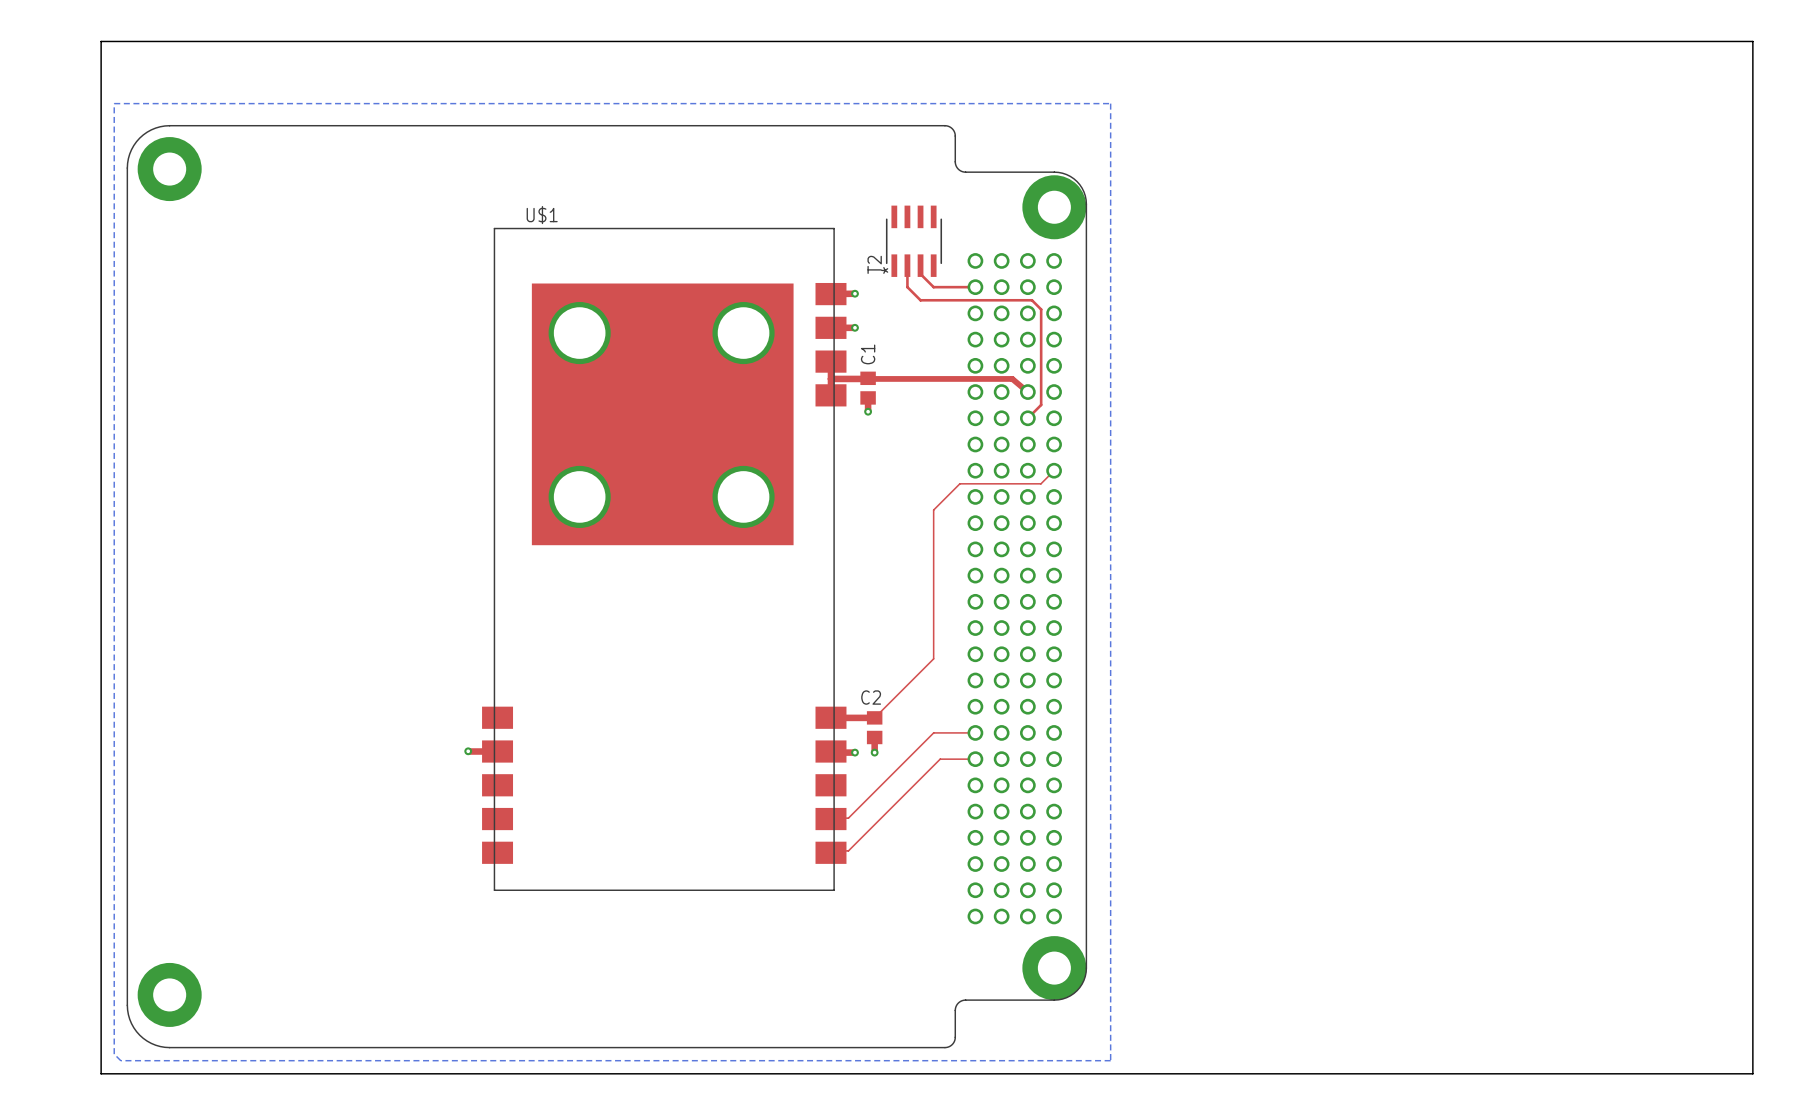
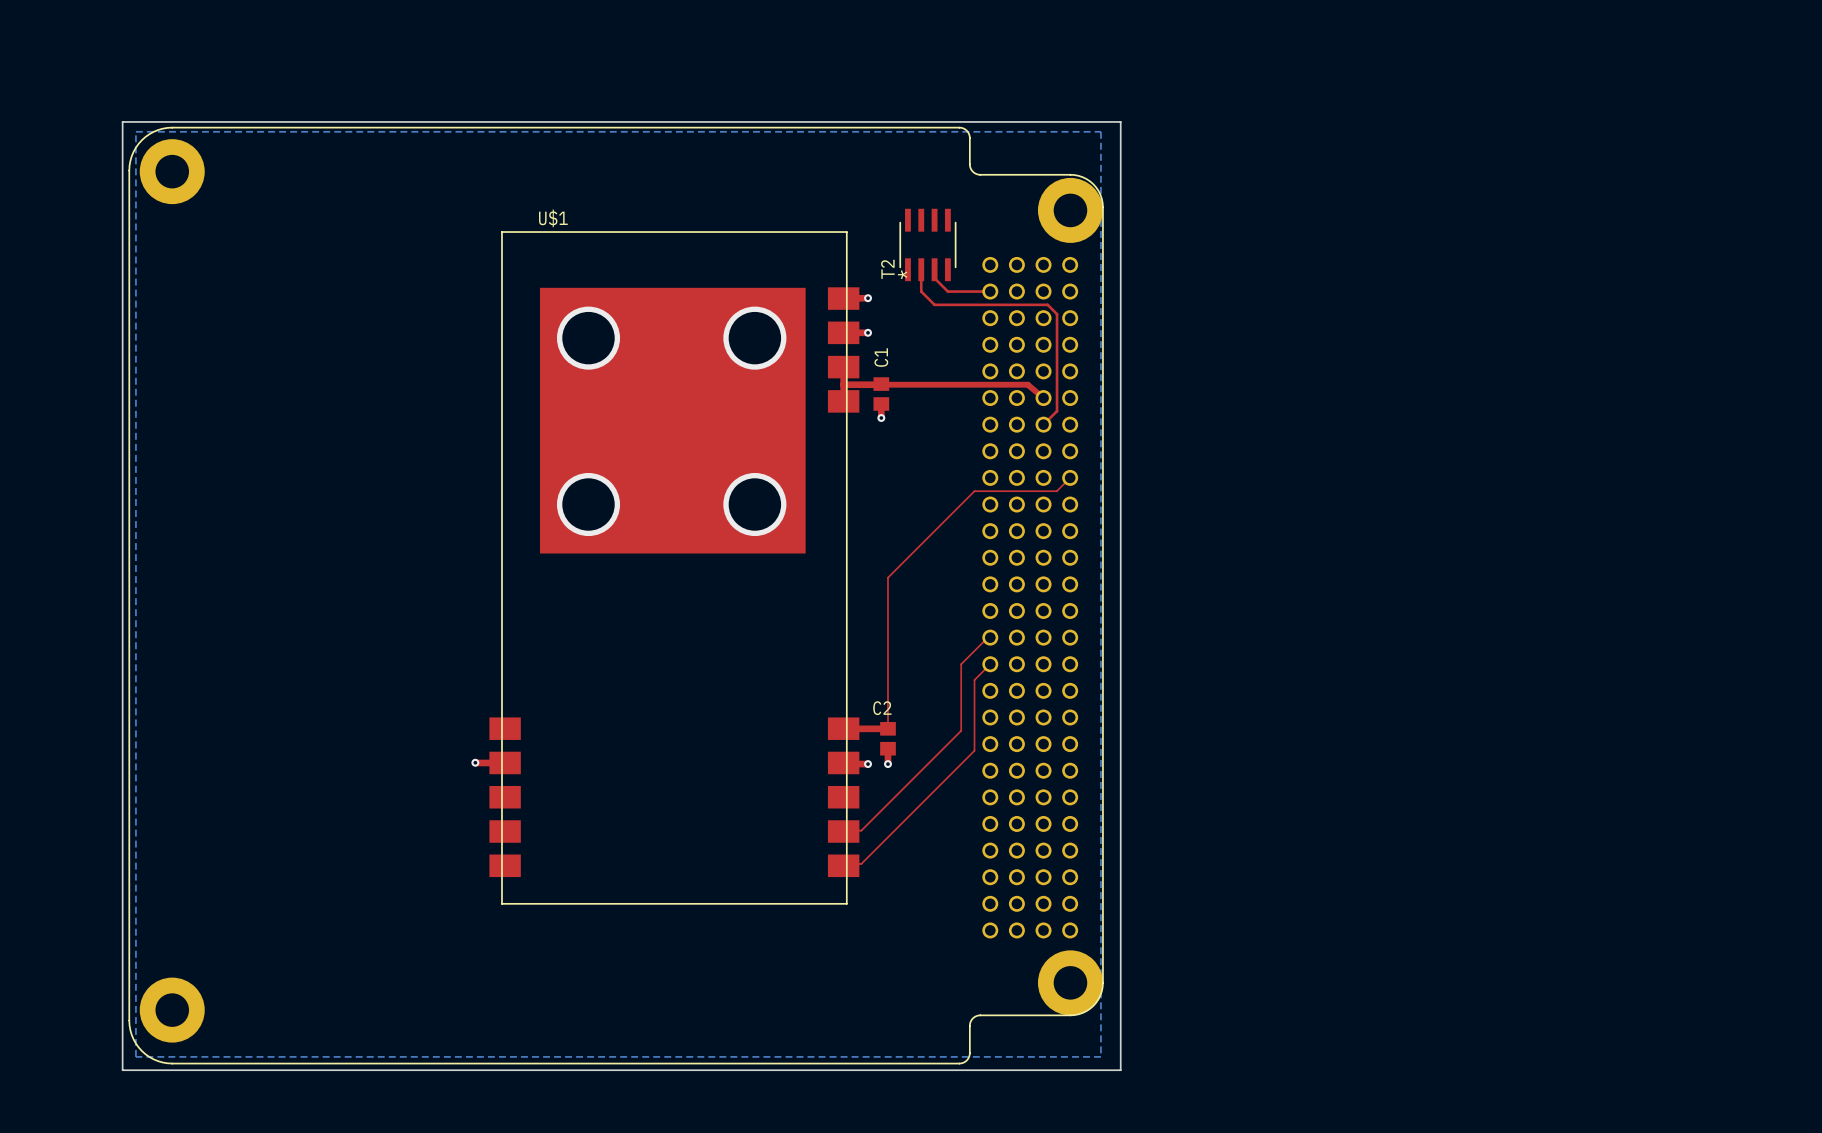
board edge: (101, 41) (1752, 41) (1752, 1073) (101, 1073) (101, 41) -> (122, 121) (122, 1070) (1120, 1070) (1120, 121) (122, 121)
bottom zone outline: (114, 103) (1110, 103) (1110, 1060) (120, 1060) (114, 1054) (114, 103) -> (135, 131) (135, 1056) (1100, 1056) (1100, 131) (135, 131)
top track: (933, 510) (933, 658) (874, 717) -> (947, 517) (887, 577) (887, 728)
top track: (933, 732) (975, 732) -> (947, 744) (961, 730) (961, 664) (987, 637) (990, 637)
top track: (940, 759) (975, 759) -> (954, 770) (974, 750) (974, 680) (990, 664)

